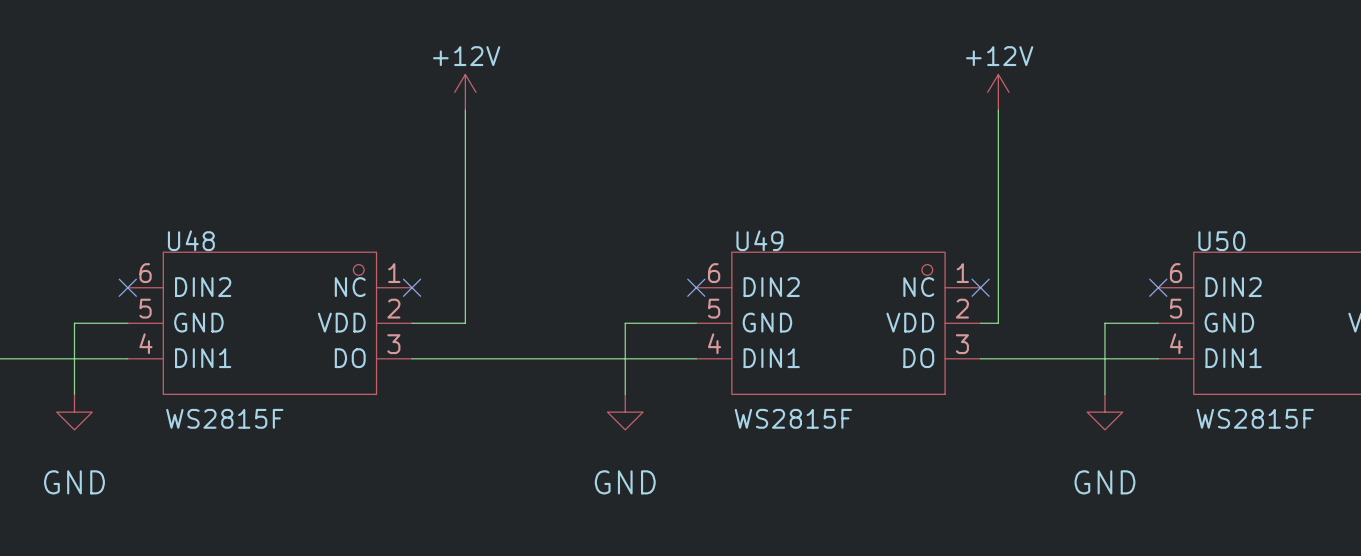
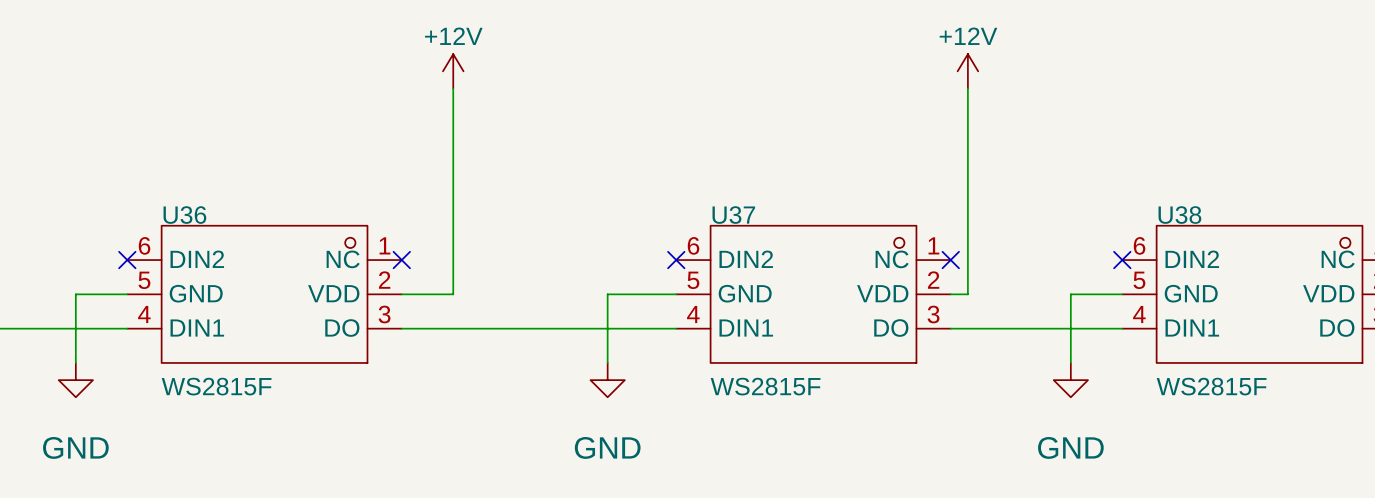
U48 name: U48 (191, 240) -> U36 (184, 215)
U49 name: U49 (759, 240) -> U37 (733, 215)
U50 name: U50 (1221, 241) -> U38 (1179, 215)

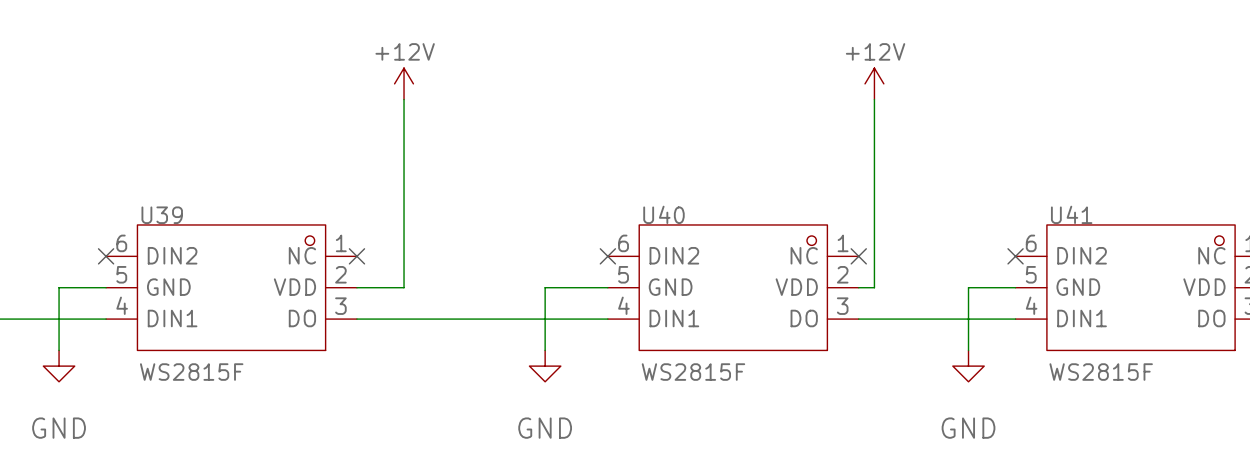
U36 name: U36 (184, 215) -> U39 (162, 215)
U37 name: U37 (733, 215) -> U40 (663, 214)
U38 name: U38 (1179, 215) -> U41 (1071, 214)

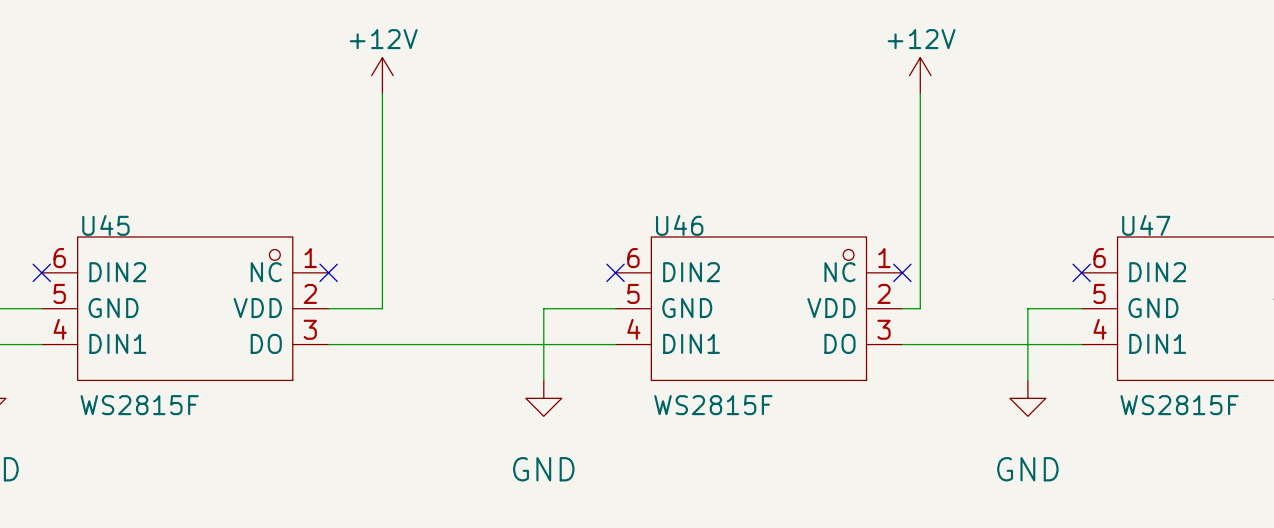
U40 name: U40 (663, 214) -> U46 (679, 225)
U41 name: U41 (1071, 214) -> U47 (1146, 225)
U39 name: U39 (162, 215) -> U45 (105, 225)

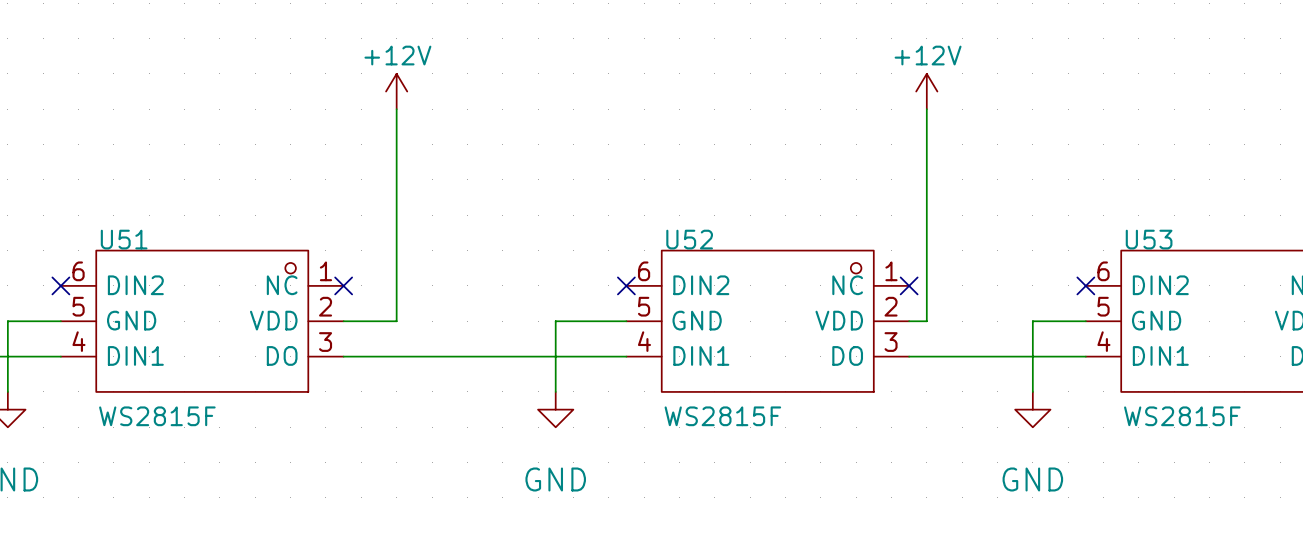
U45 name: U45 (105, 225) -> U51 (124, 239)
U46 name: U46 (679, 225) -> U52 (689, 239)
U47 name: U47 (1146, 225) -> U53 (1149, 239)

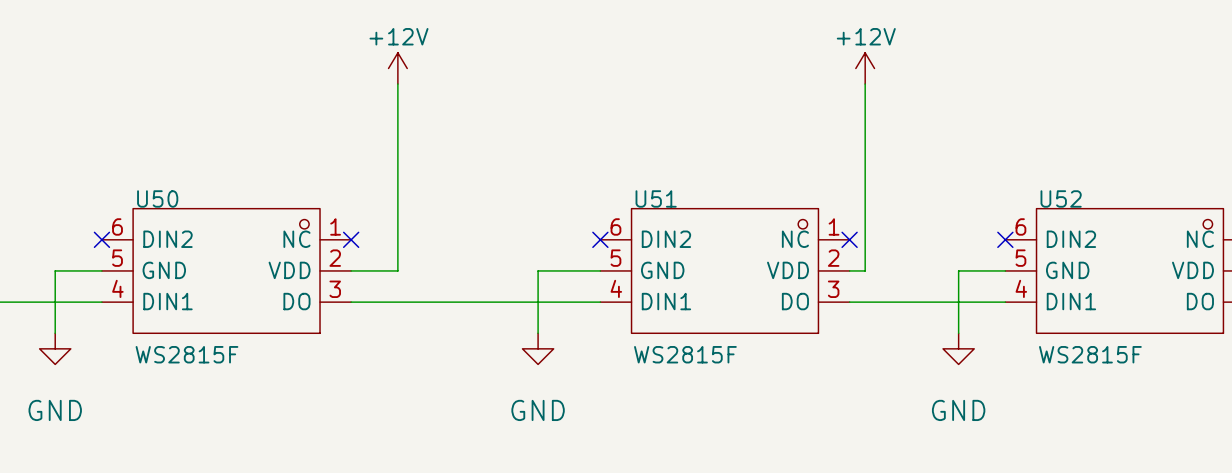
U51 name: U51 (124, 239) -> U50 (157, 198)
U52 name: U52 (689, 239) -> U51 (656, 198)
U53 name: U53 (1149, 239) -> U52 (1061, 198)

